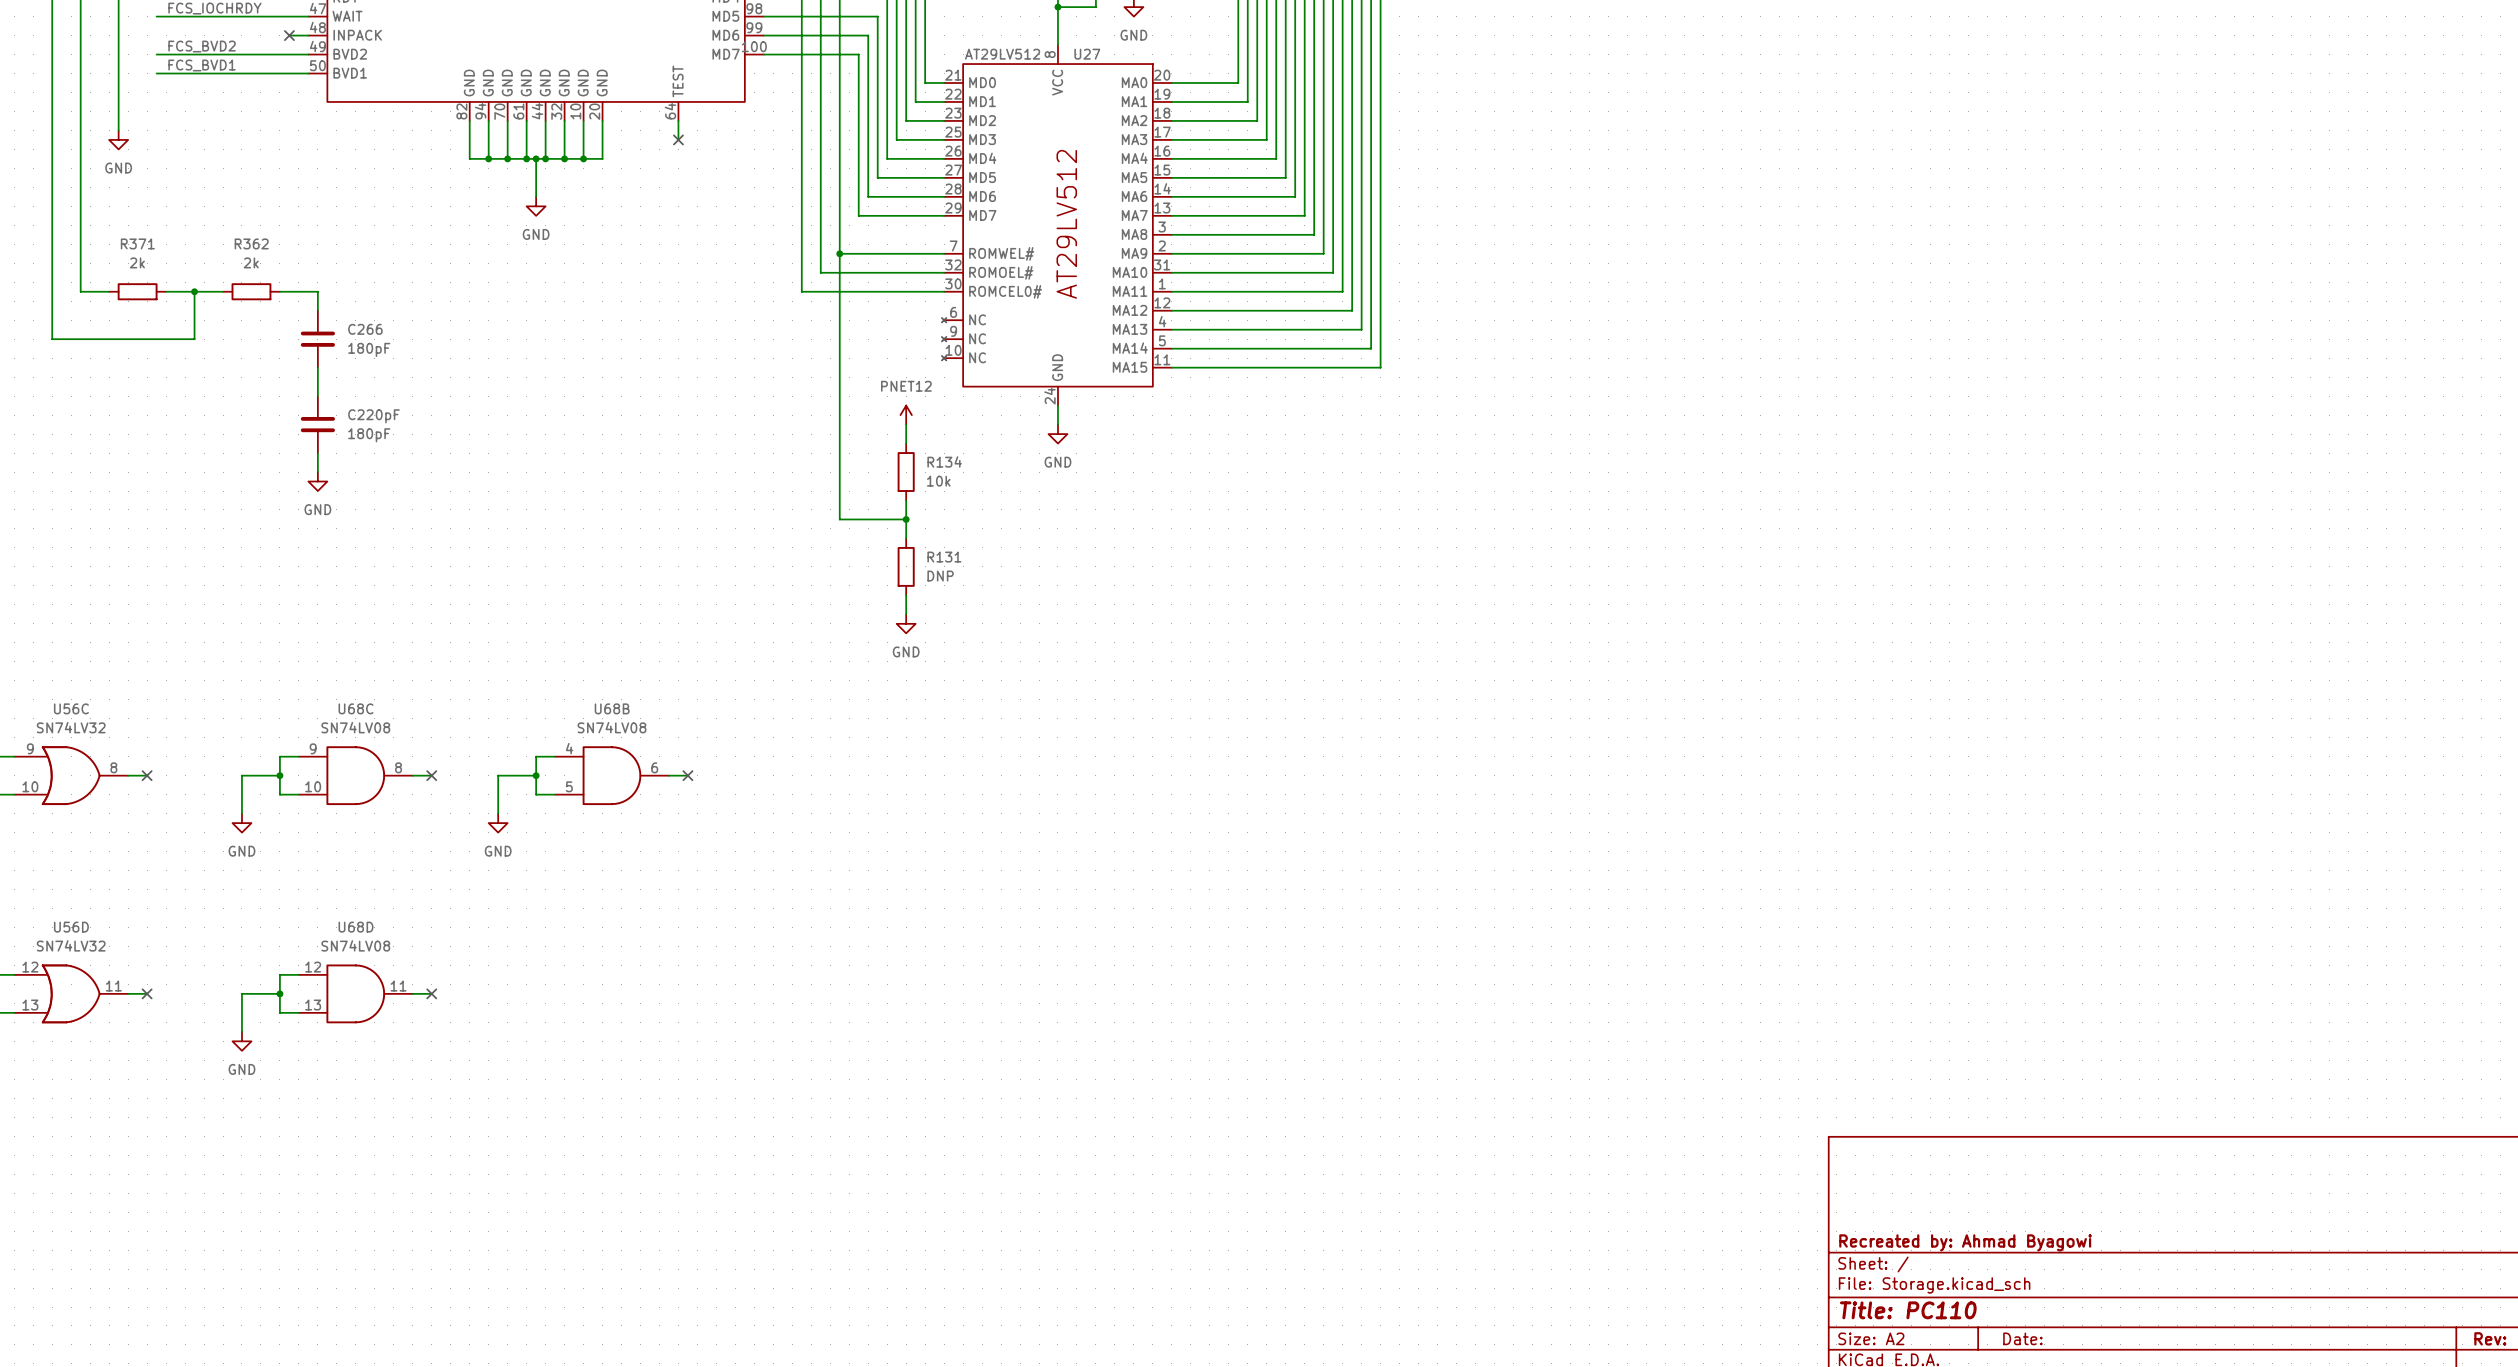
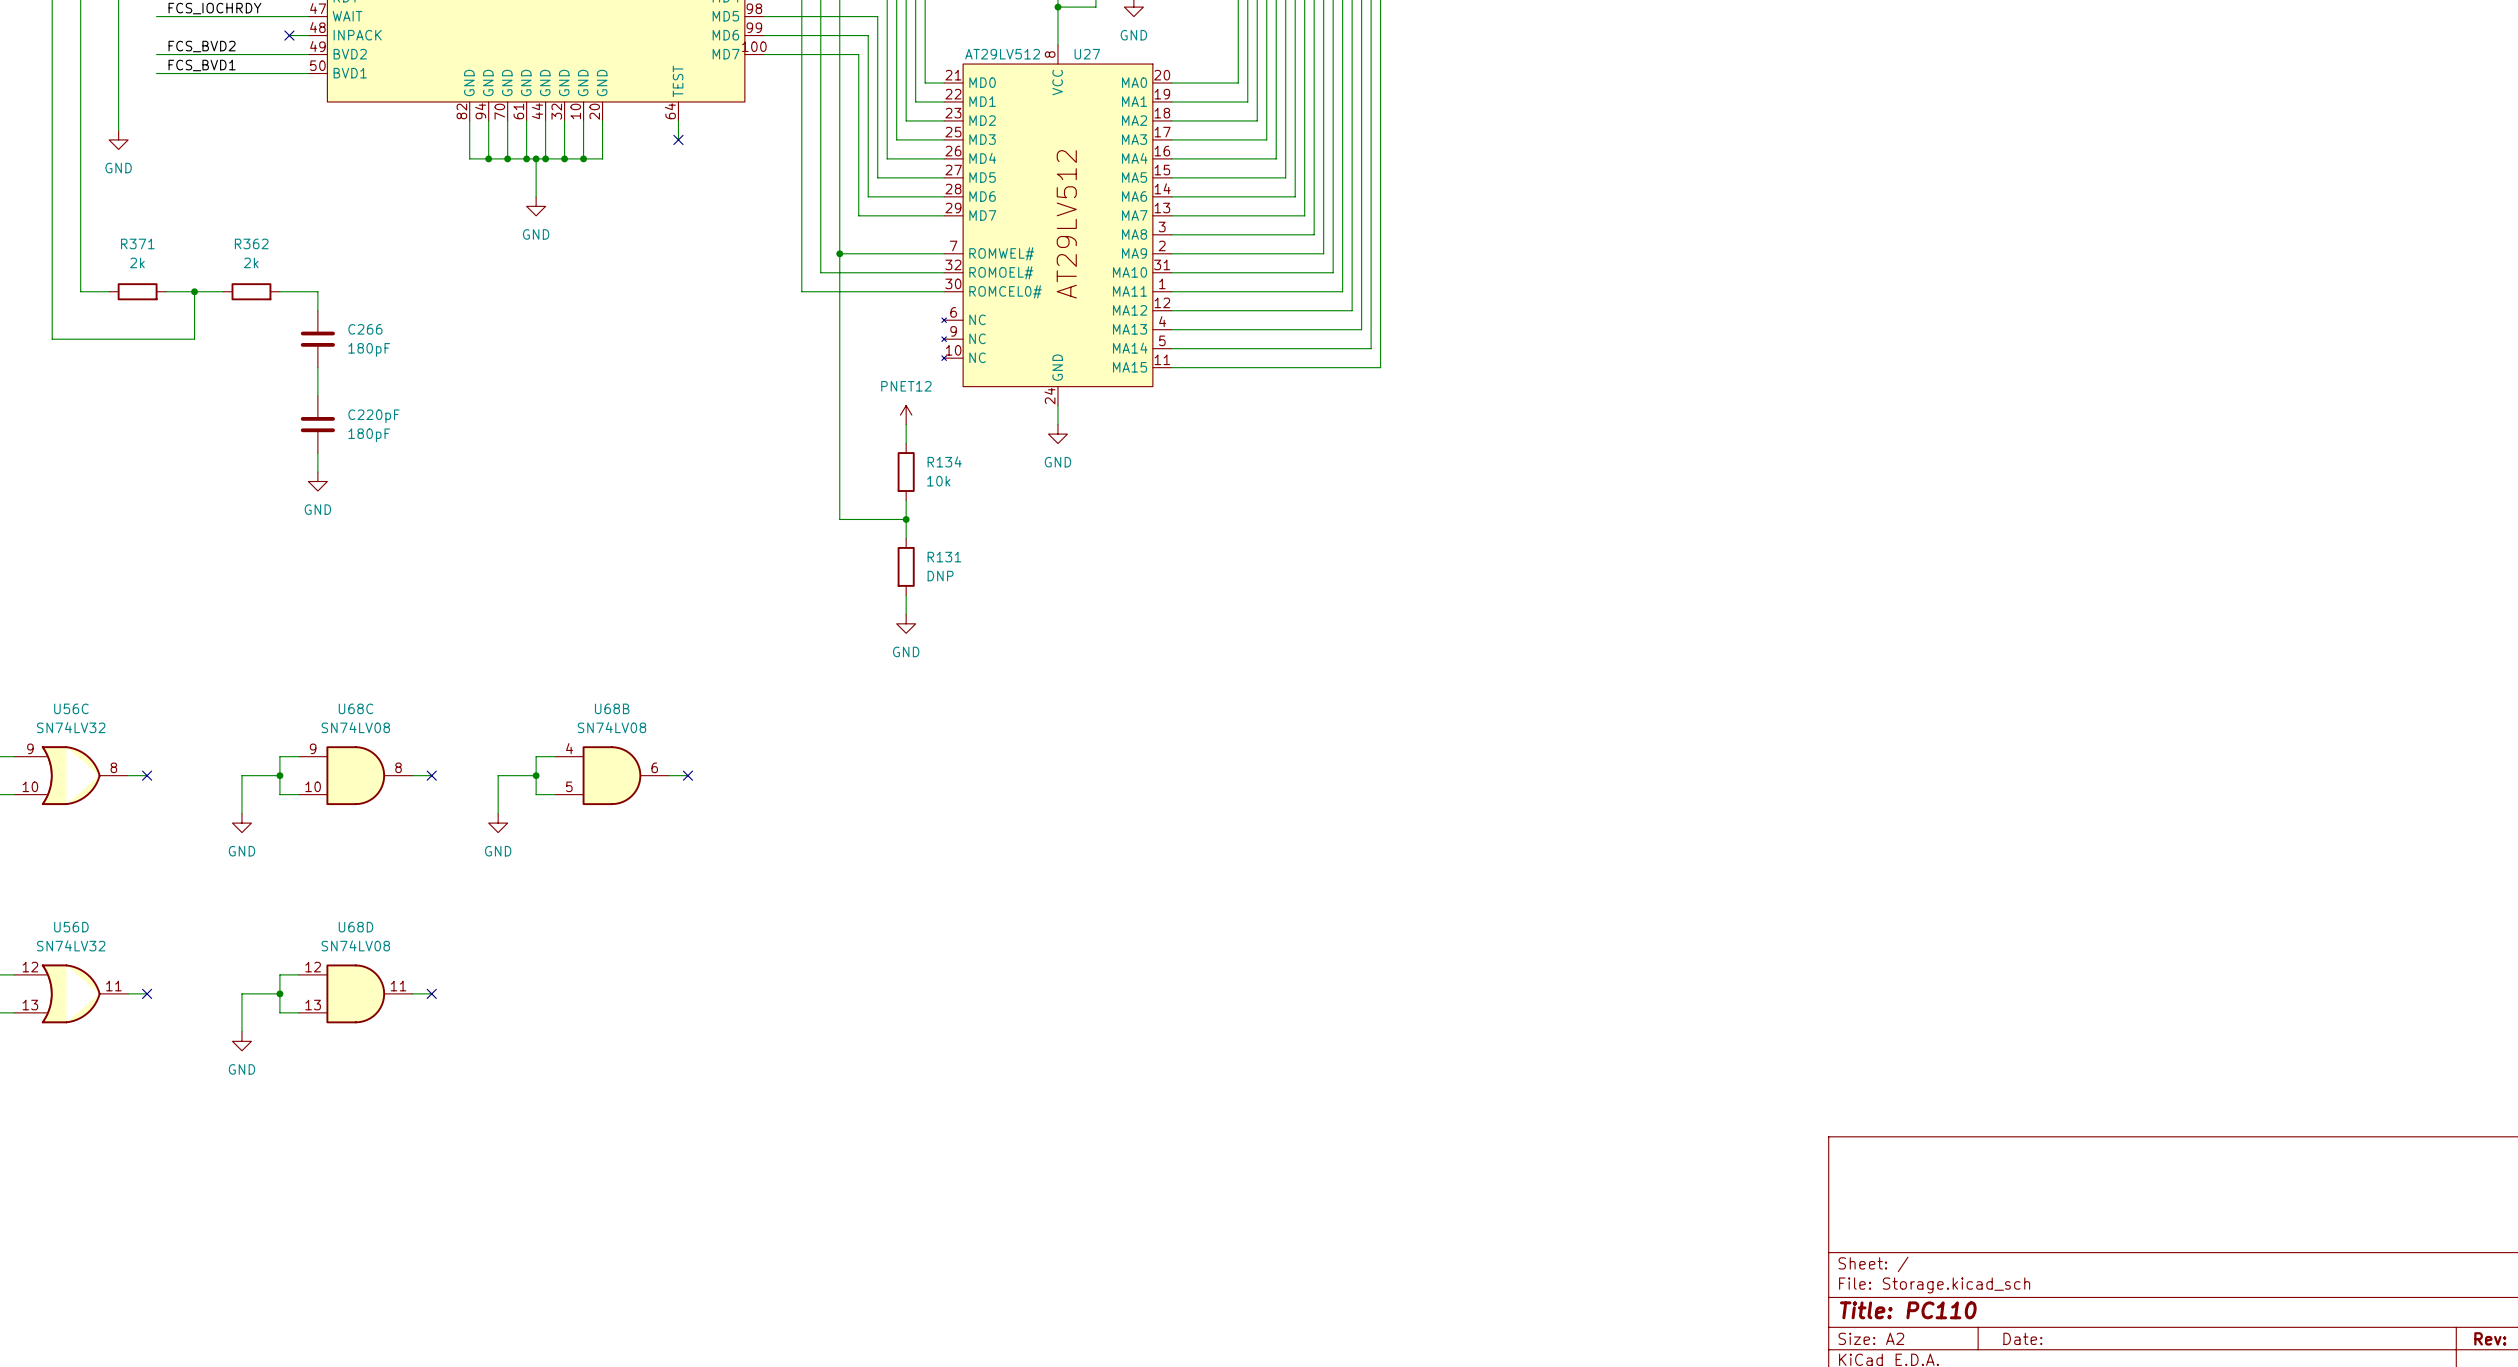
title block: Recreated by: Ahmad Byagowi (1965, 1242) -> none

